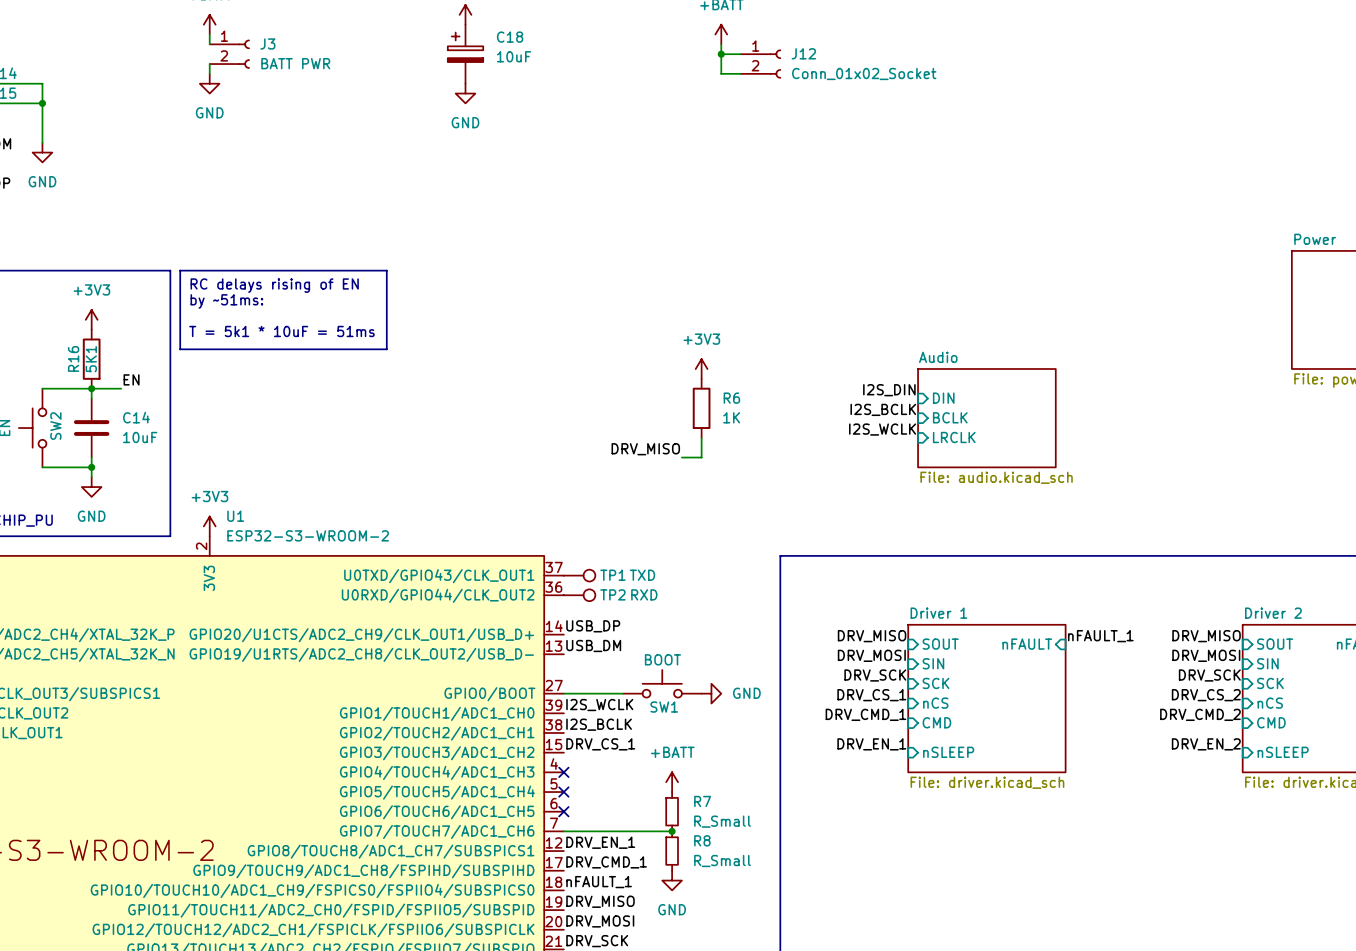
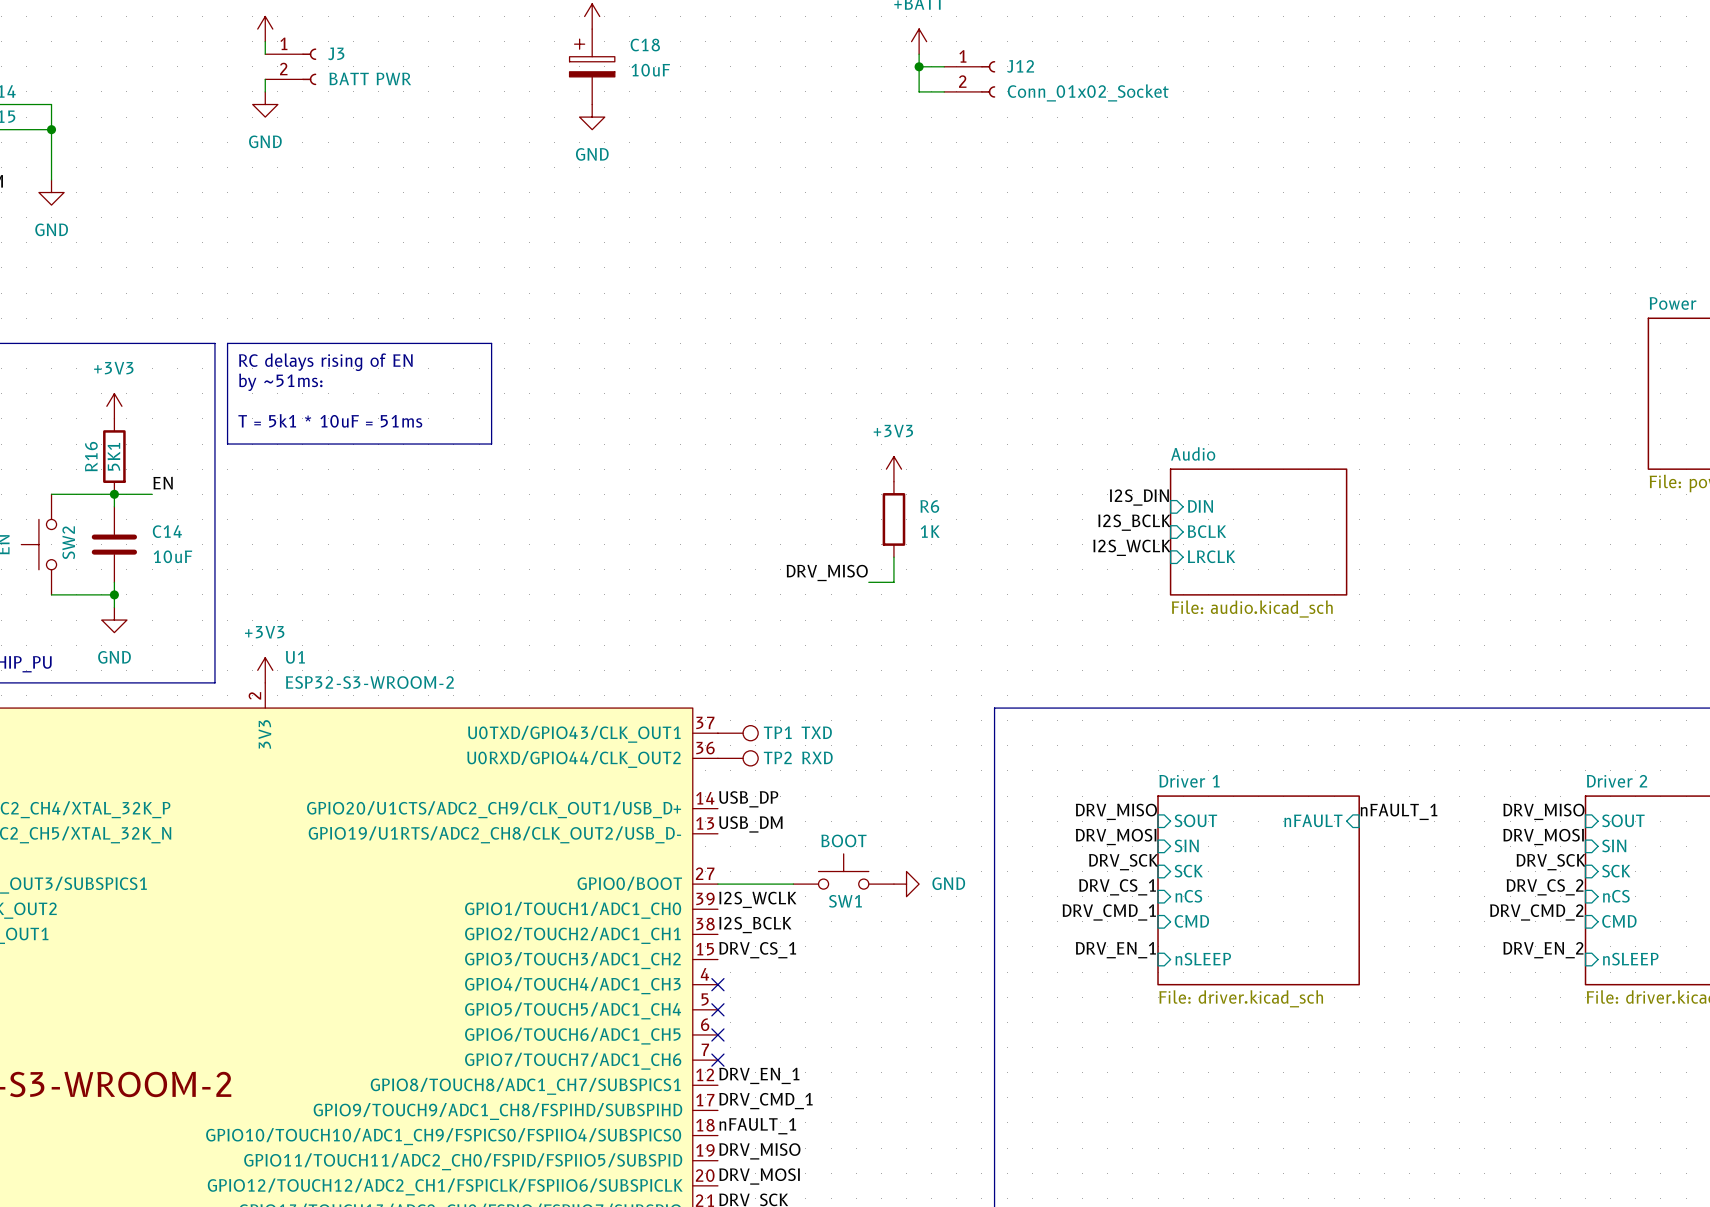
power symbol: +BATT (672, 782) -> none
R7: R_Small (672, 811) -> none
wire: (563, 831) (672, 831) -> none
no-connect mark: none -> (717, 1060)
junction: (672, 831) -> none
R8: R_Small (672, 851) -> none
power symbol: GND (672, 880) -> none

